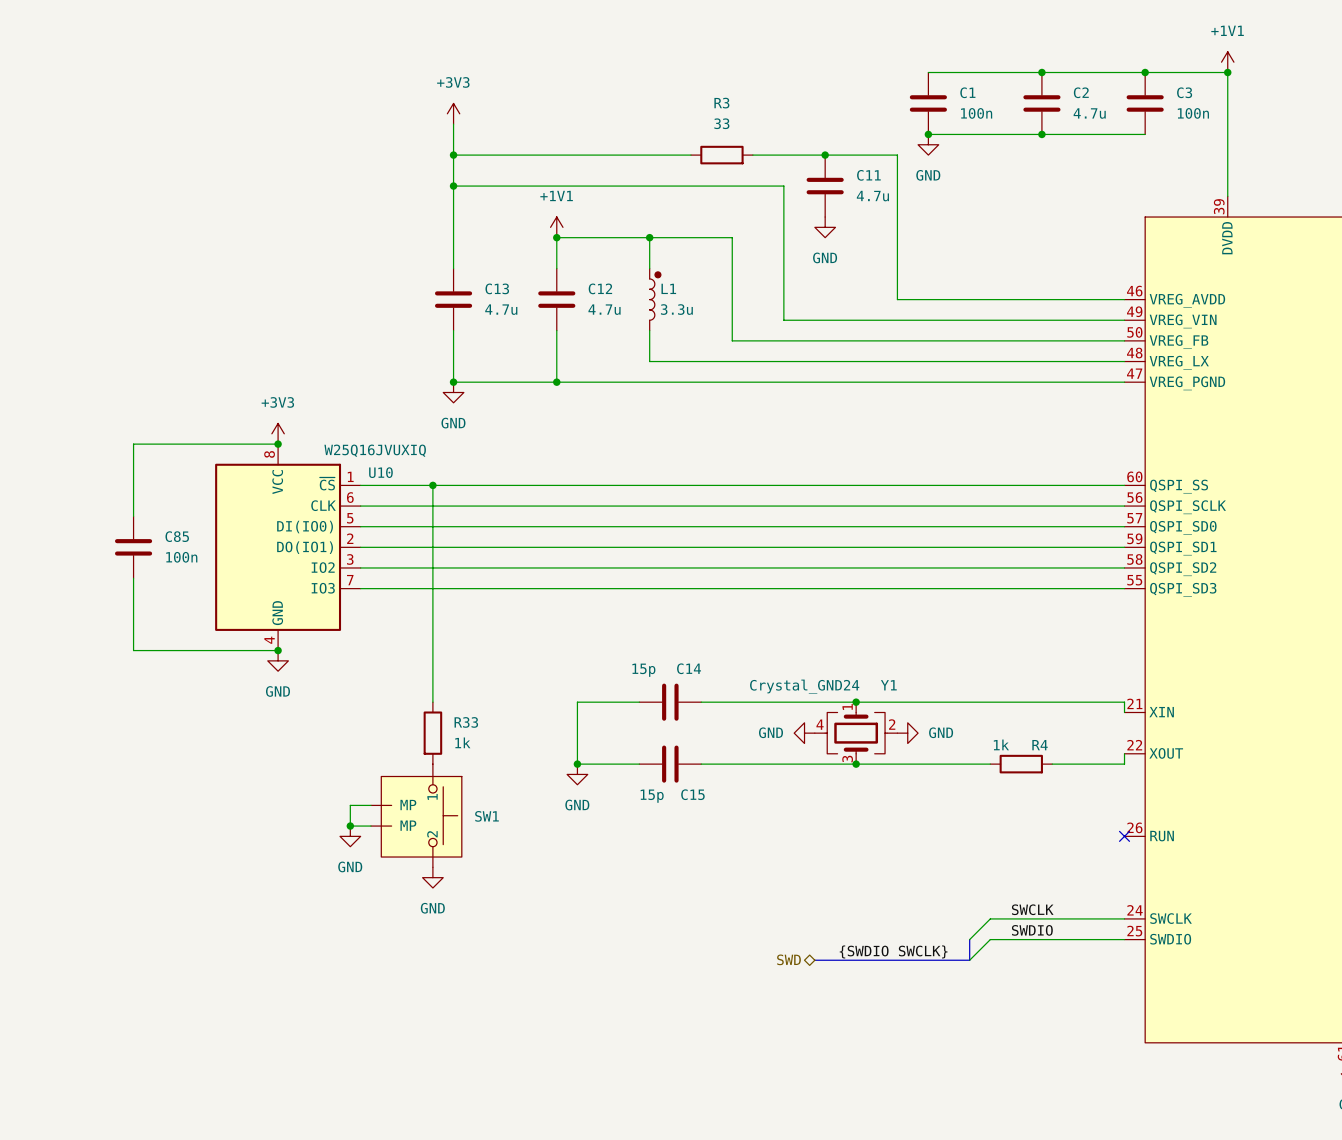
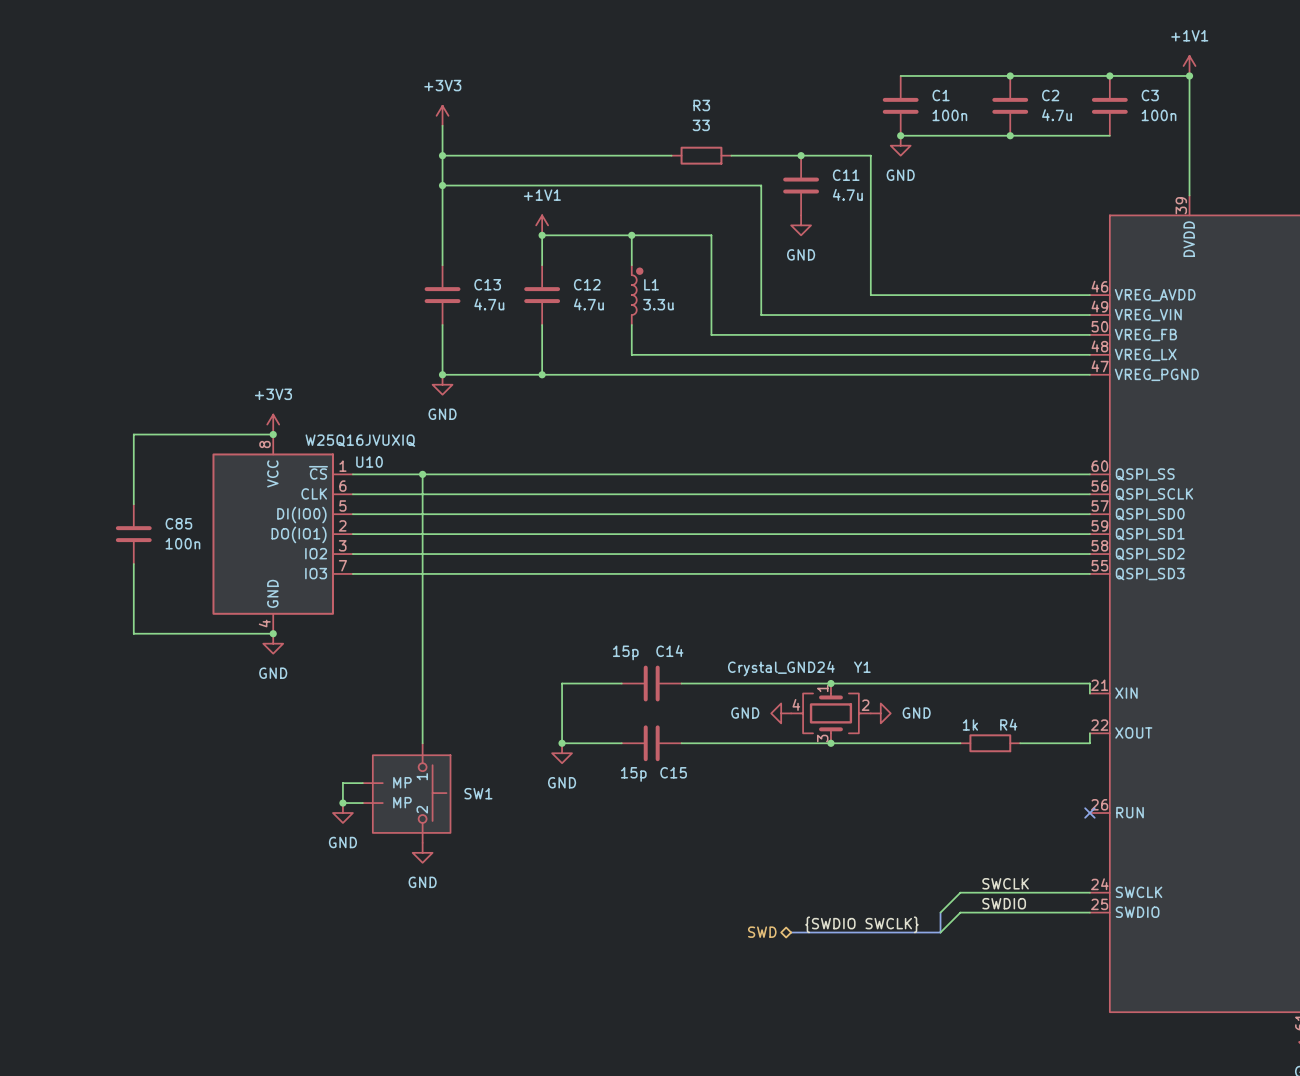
wire: none -> (422, 683) (422, 743)
R33: 1k (432, 733) -> none

